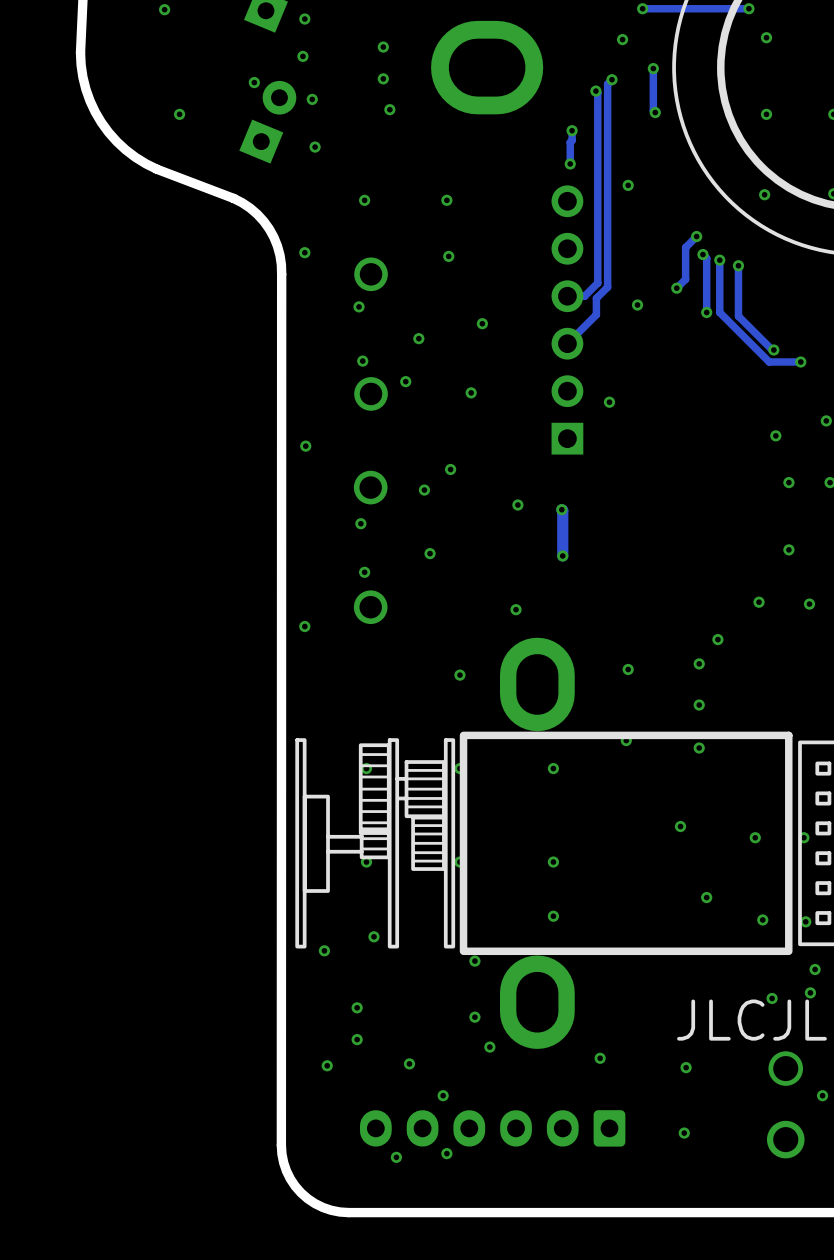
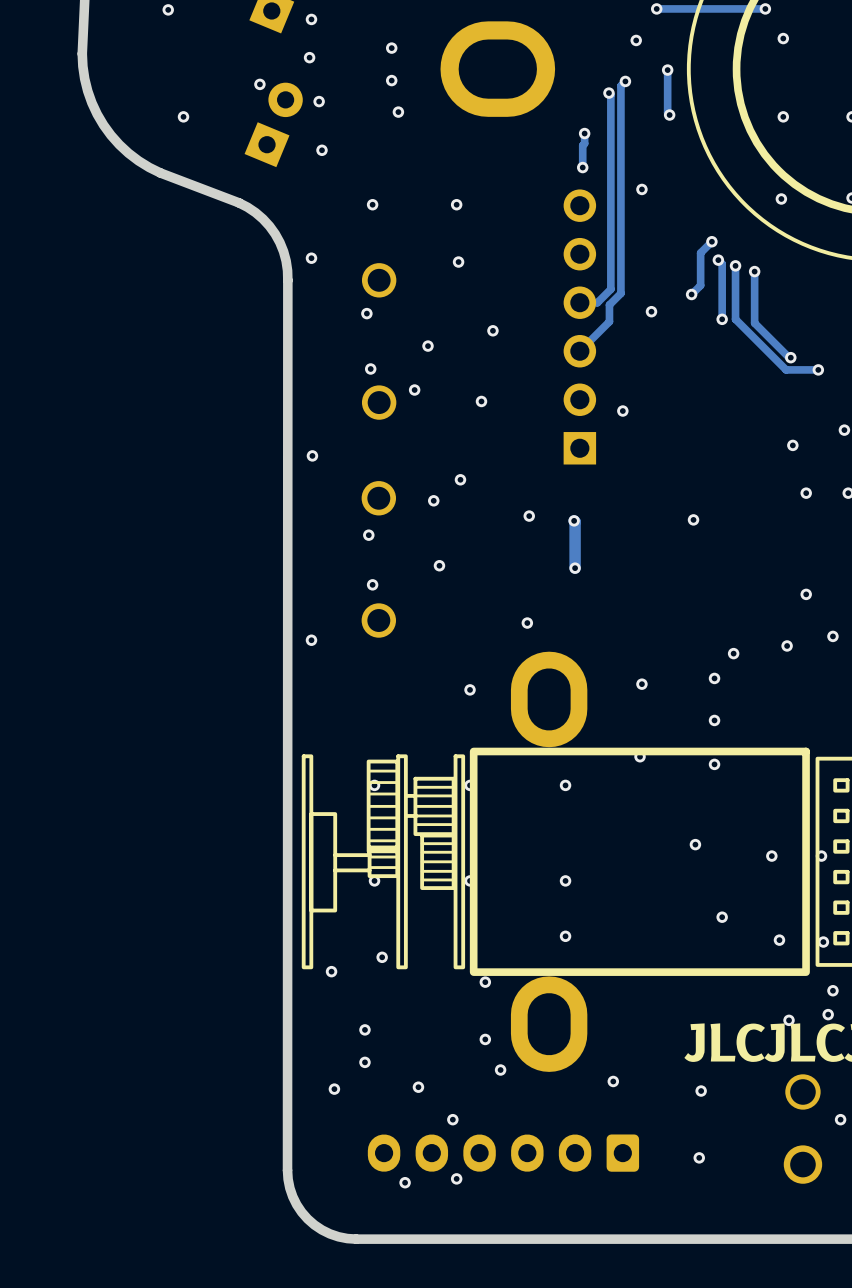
via: none -> (693, 519)
via: (788, 549) -> none
via: none -> (806, 594)
via: (759, 602) -> none
via: (809, 604) -> none
via: none -> (832, 636)
via: none -> (787, 645)

